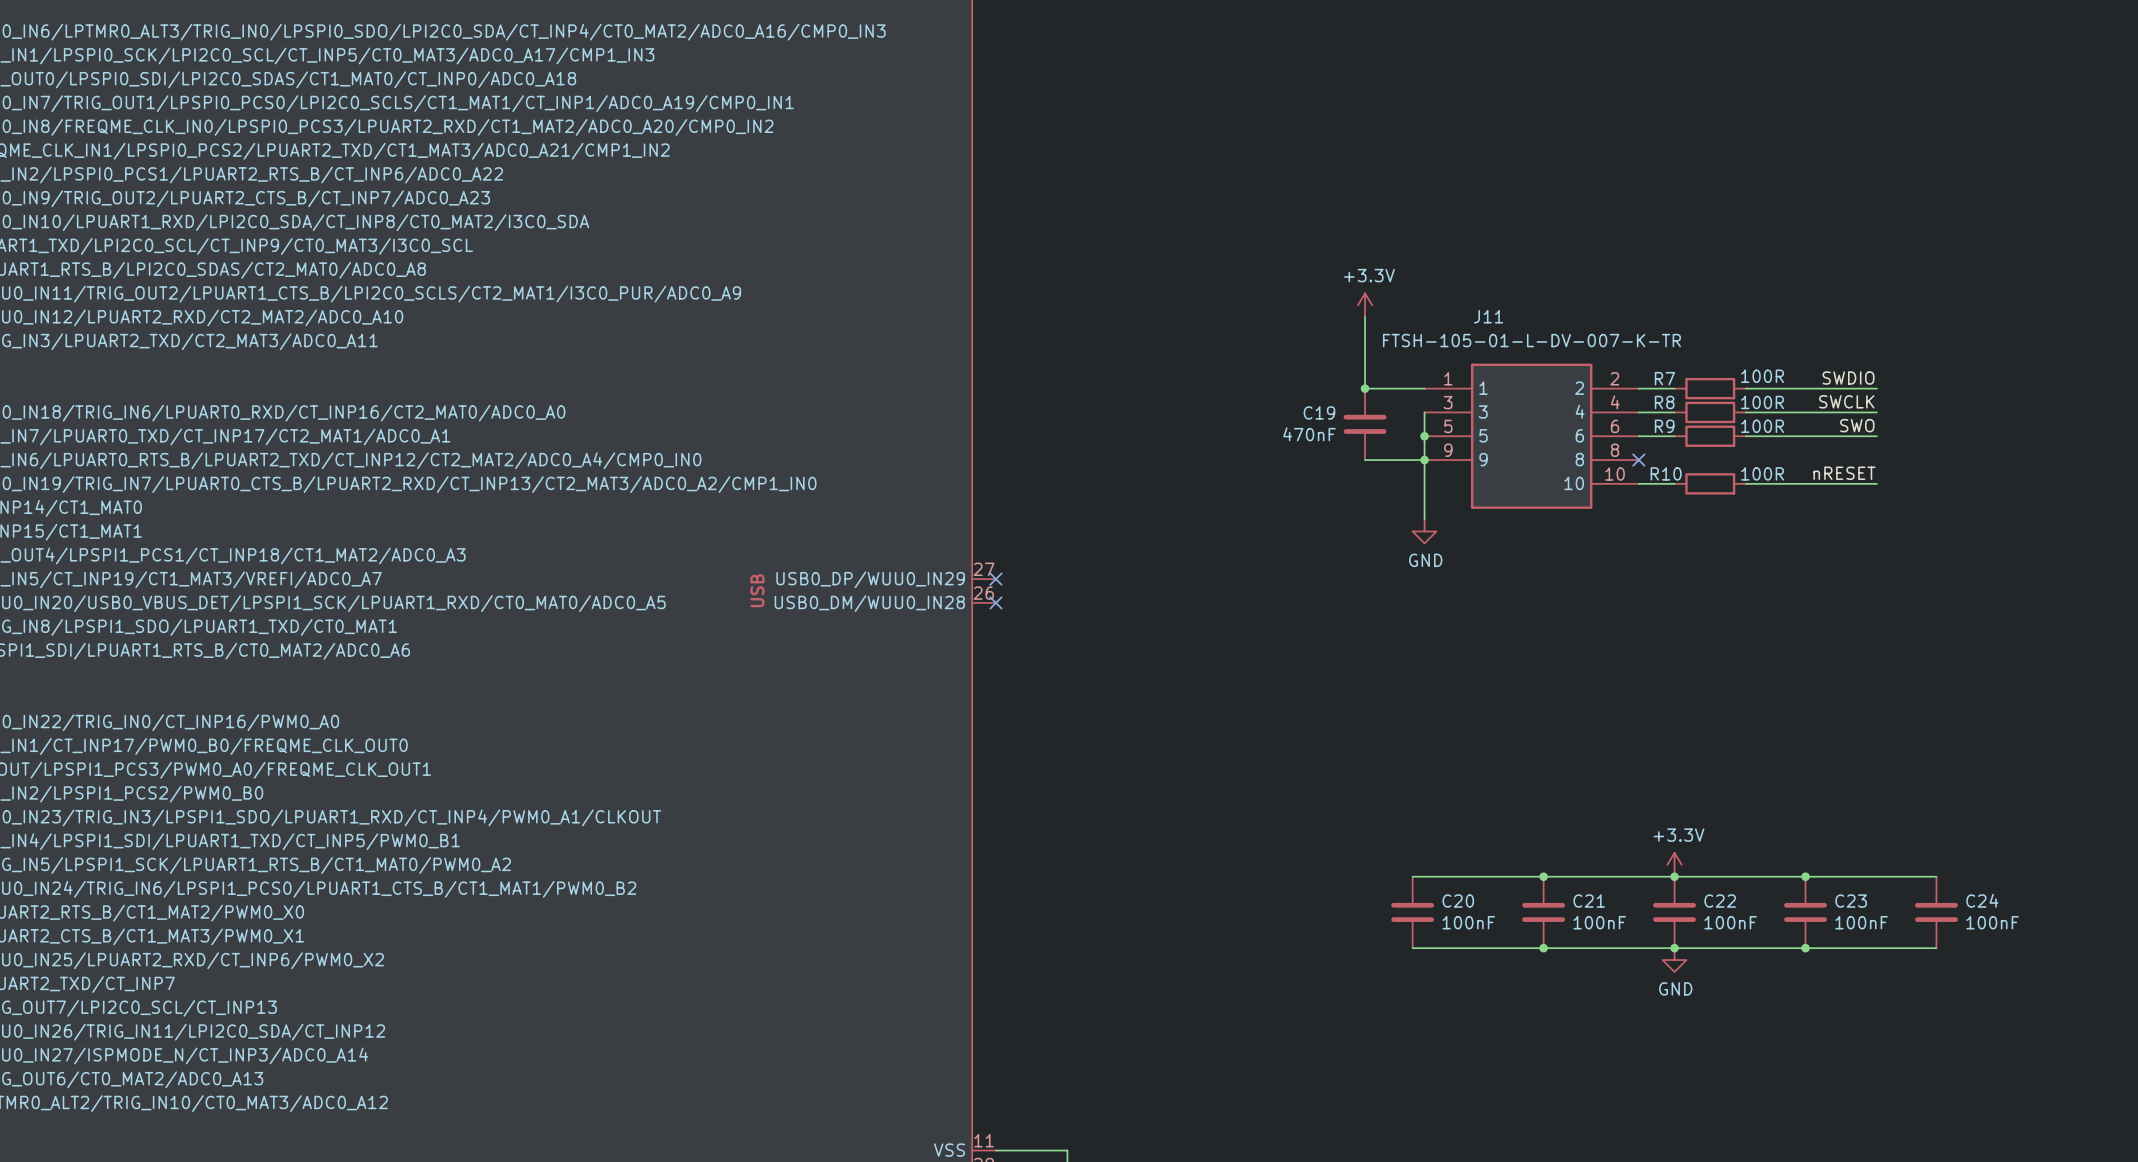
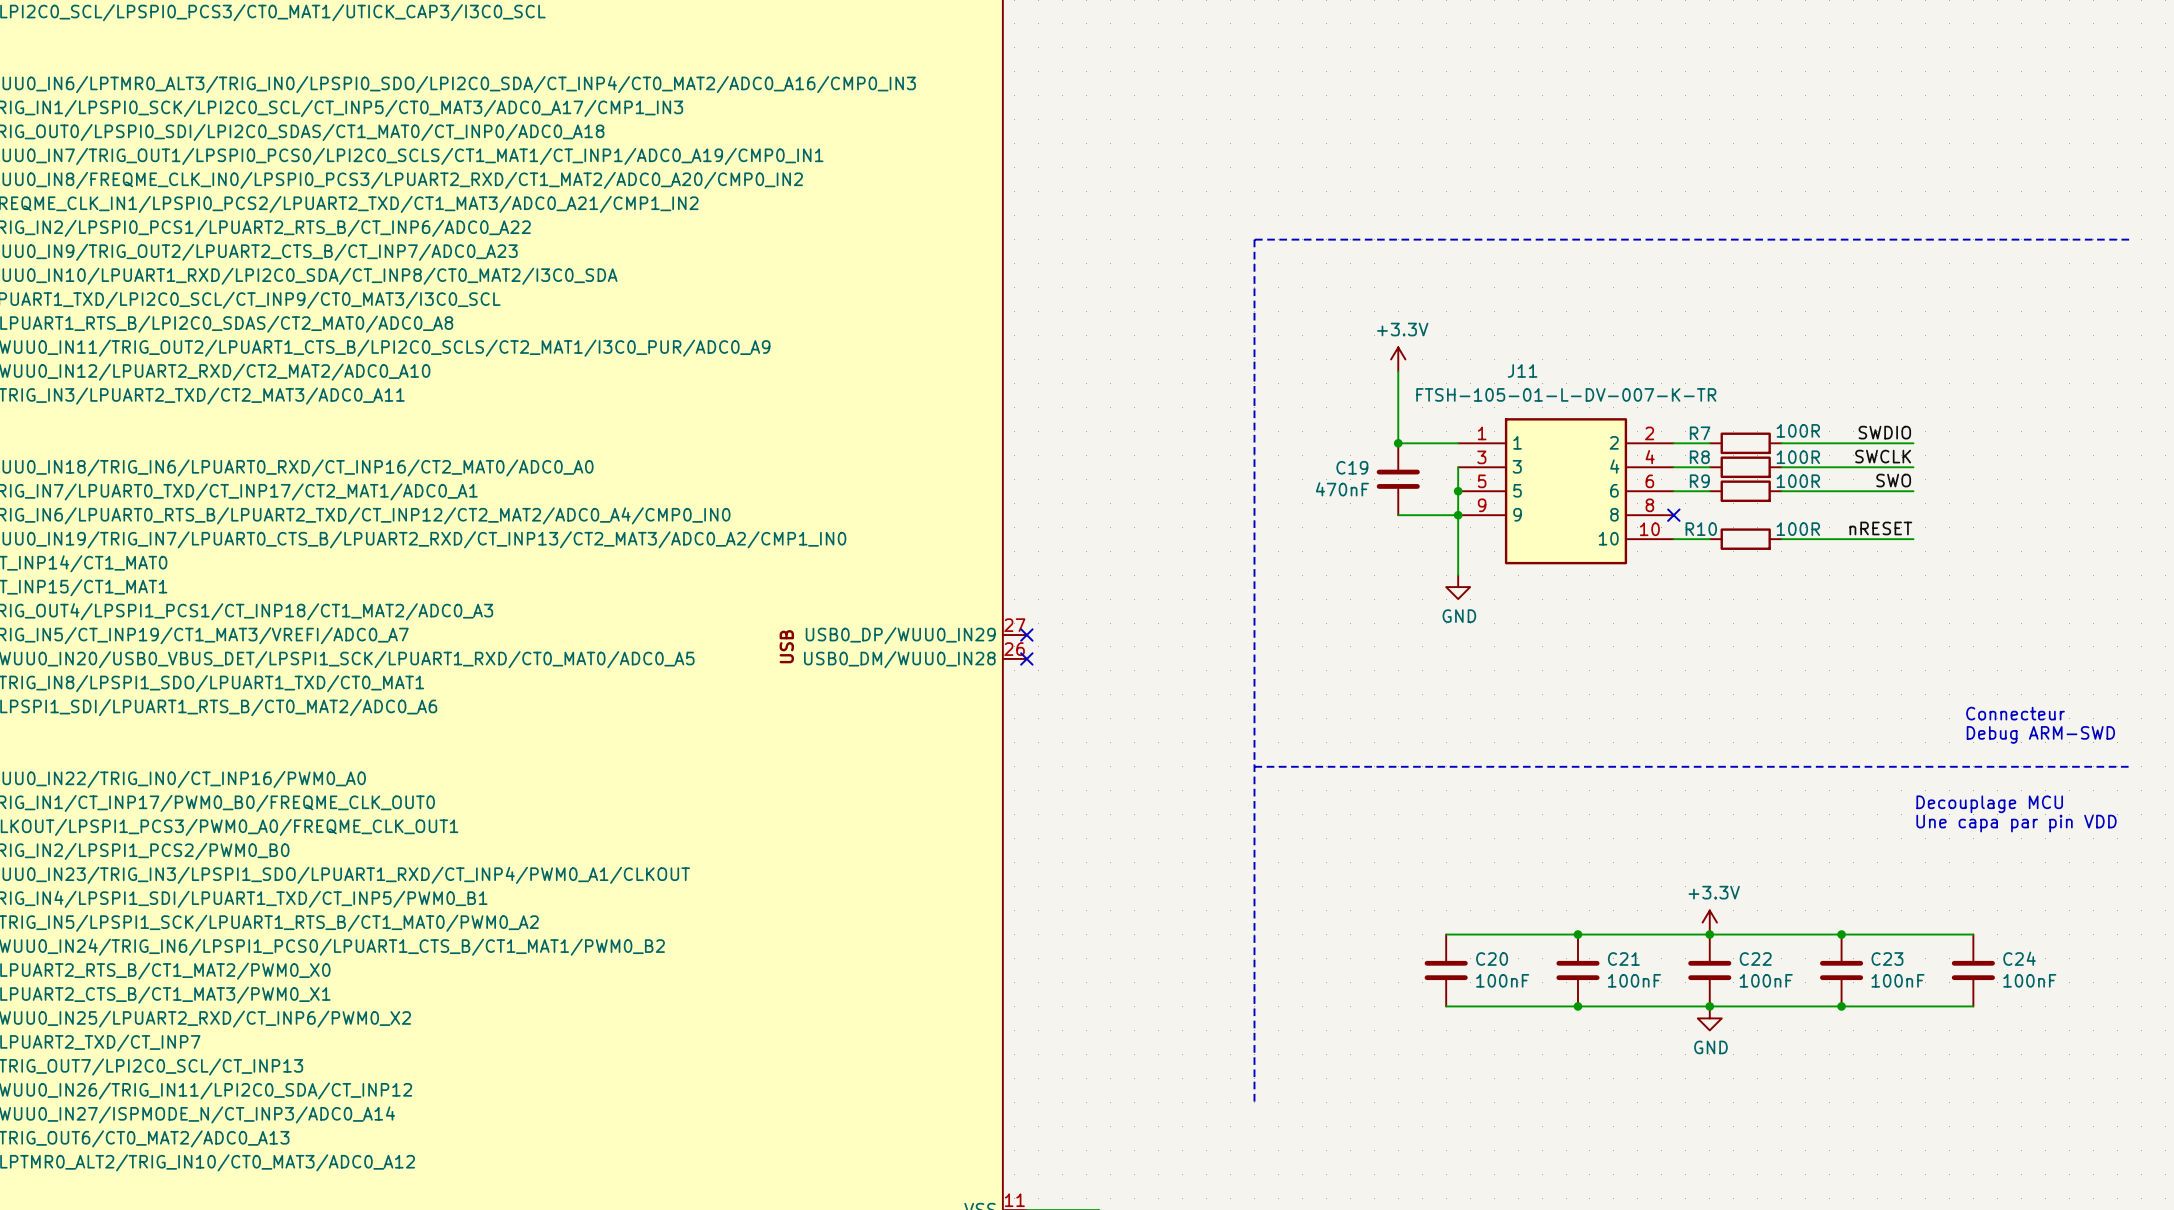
line: none -> (2129, 239) (1254, 239) (1254, 1102)
text: none -> Connecteur (2015, 713)
text: none -> Debug ARM-SWD (2040, 734)
line: none -> (1254, 766) (2129, 766)
text: none -> Decouplage MCU (1989, 804)
text: none -> Une capa par pin VDD (2016, 823)

